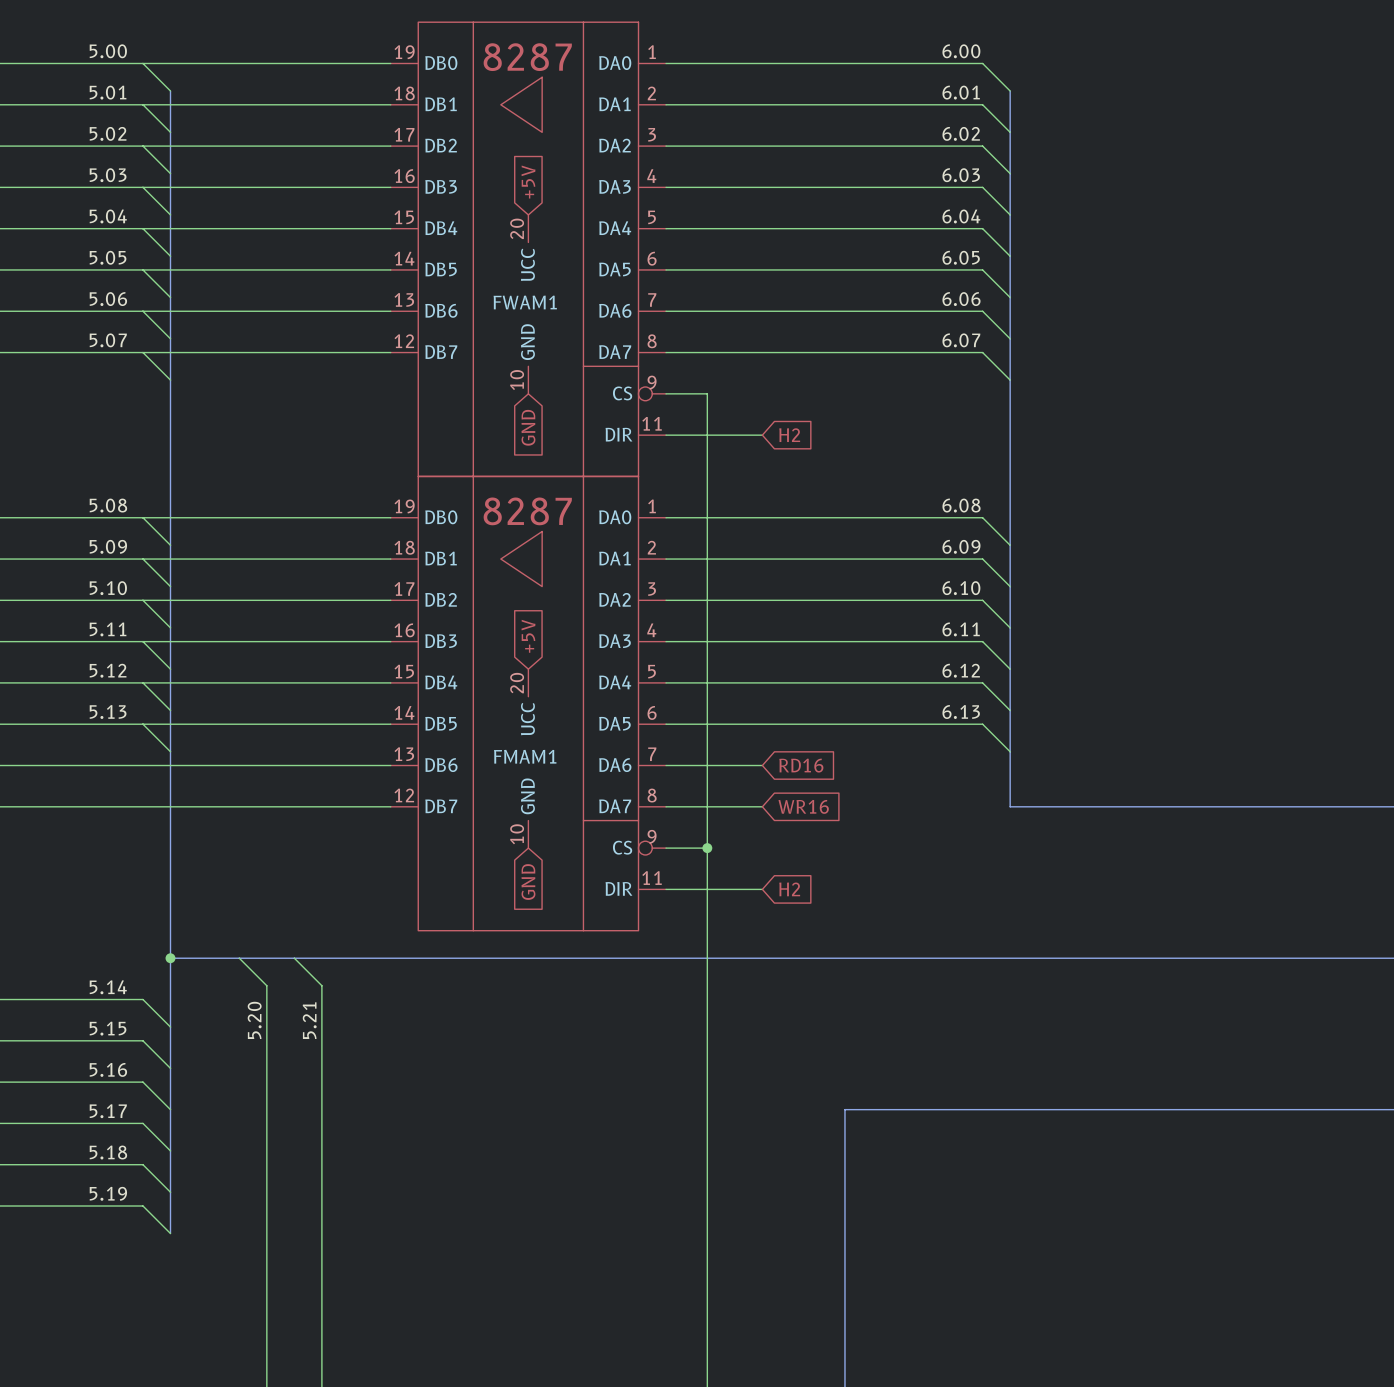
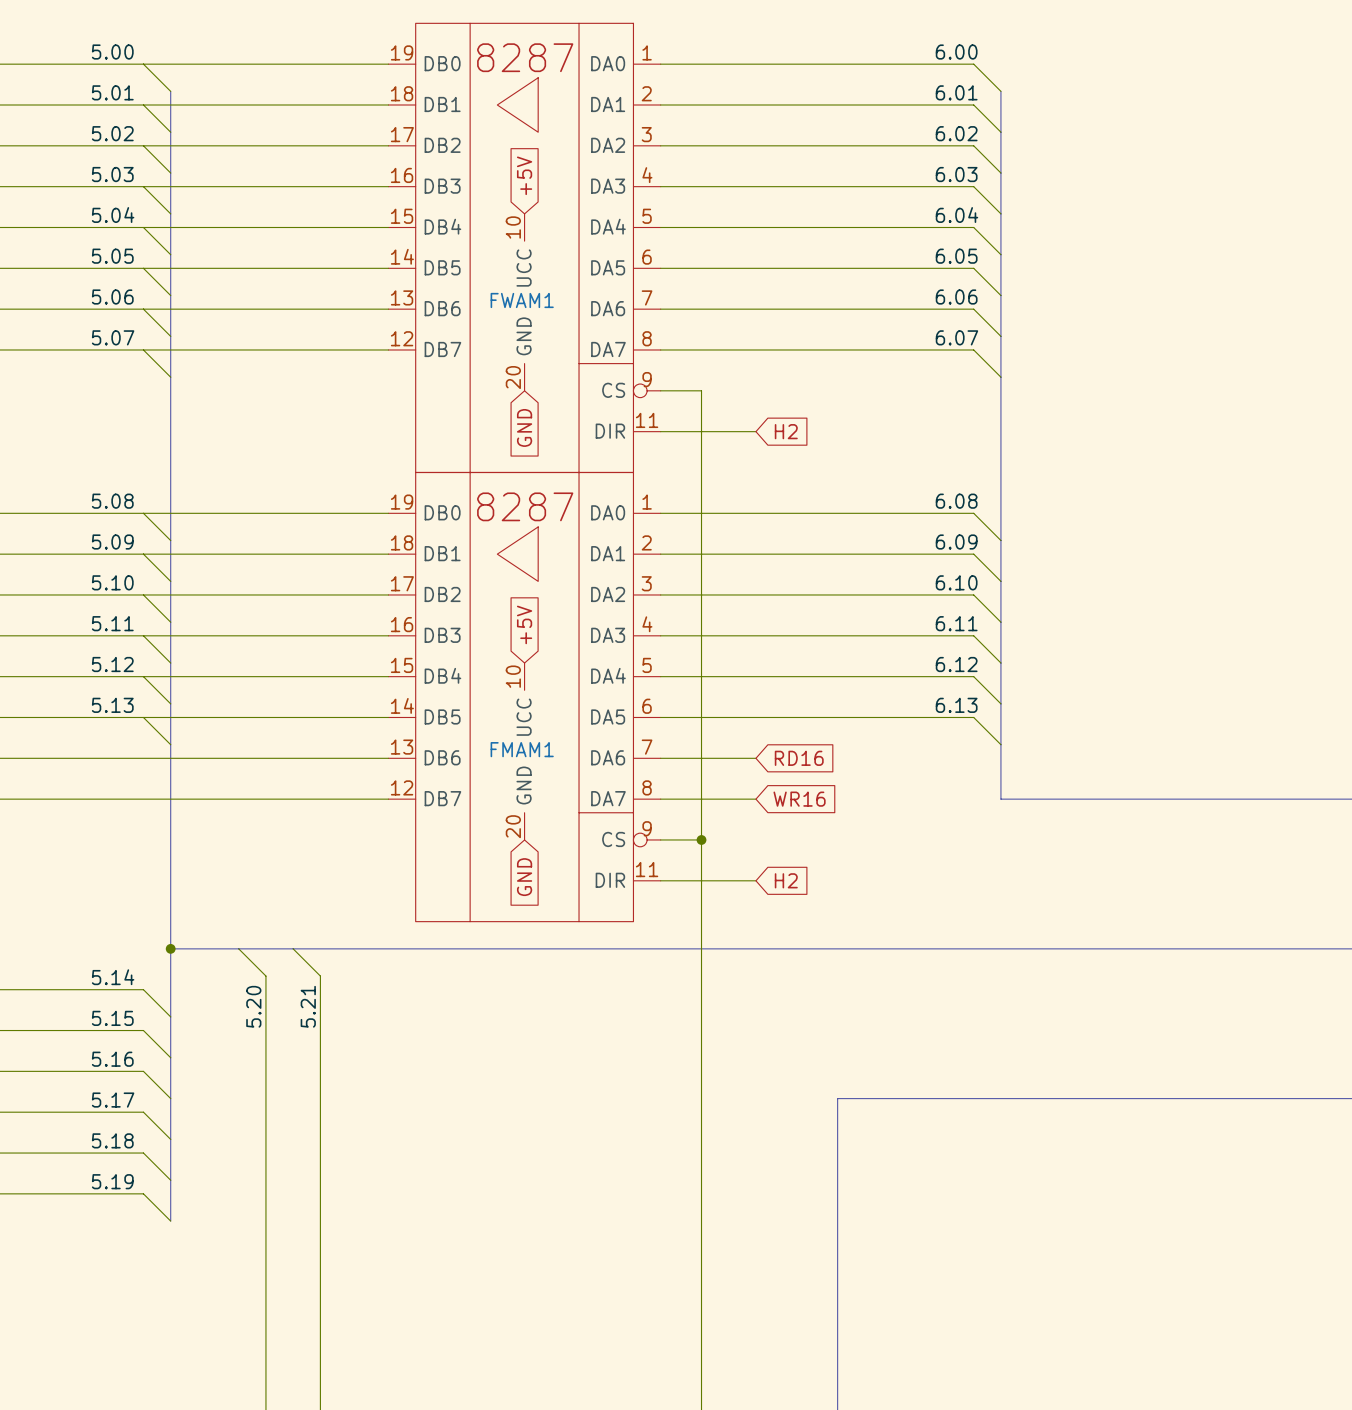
FWAM1 pin number: 20 (517, 228) -> 10 (513, 227)
FWAM1 pin number: 10 (517, 380) -> 20 (513, 377)
FMAM1 pin number: 20 (517, 683) -> 10 (513, 676)
FMAM1 pin number: 10 (517, 834) -> 20 (513, 826)

